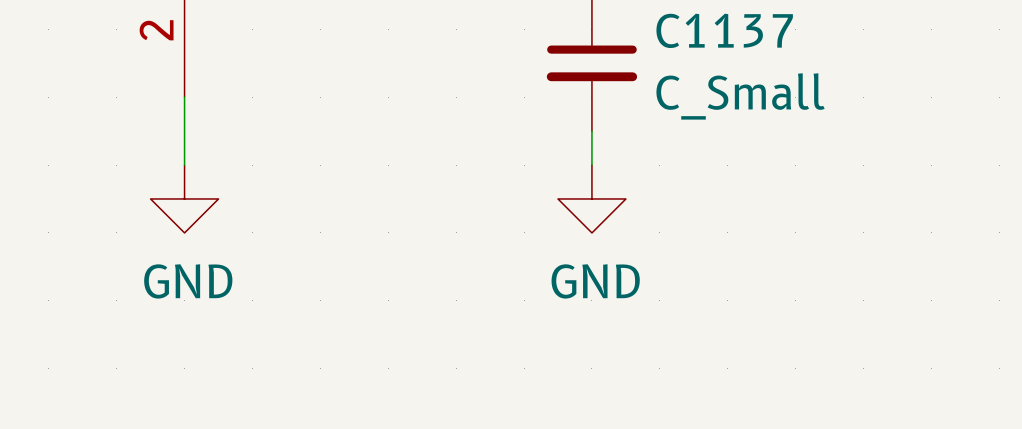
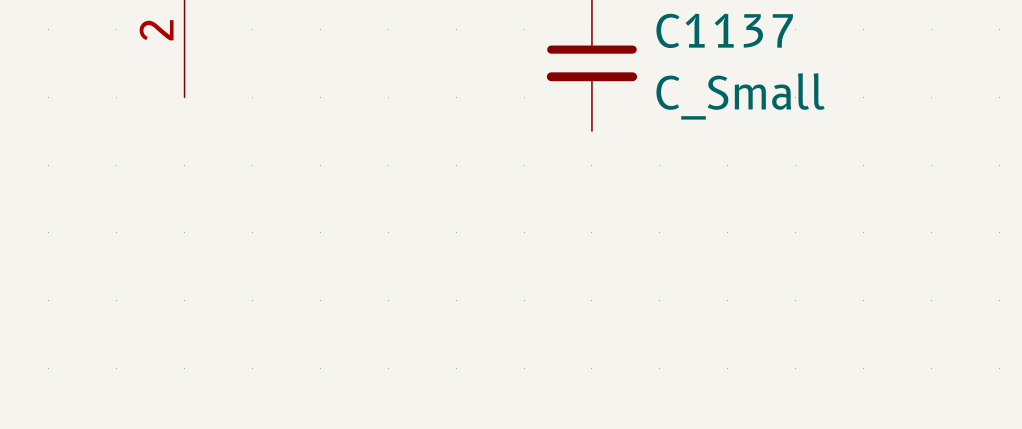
wire: (184, 97) (184, 165) -> none
wire: (591, 131) (591, 165) -> none
power symbol: GND (184, 198) -> none
power symbol: GND (591, 198) -> none

